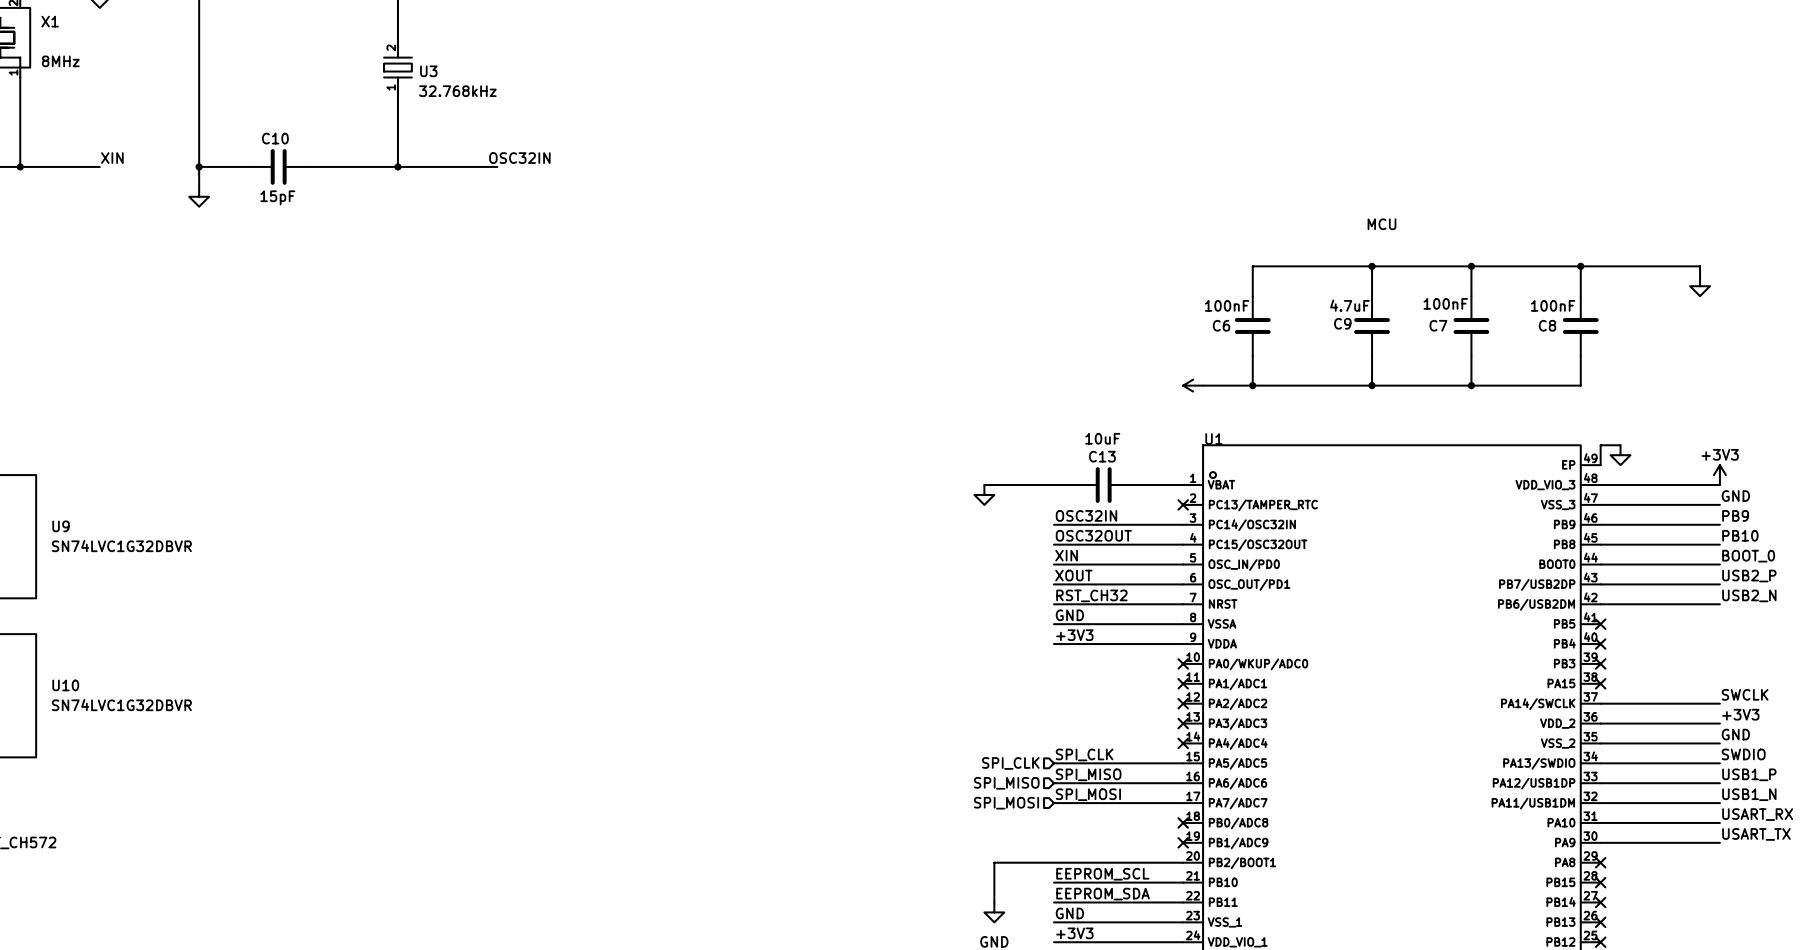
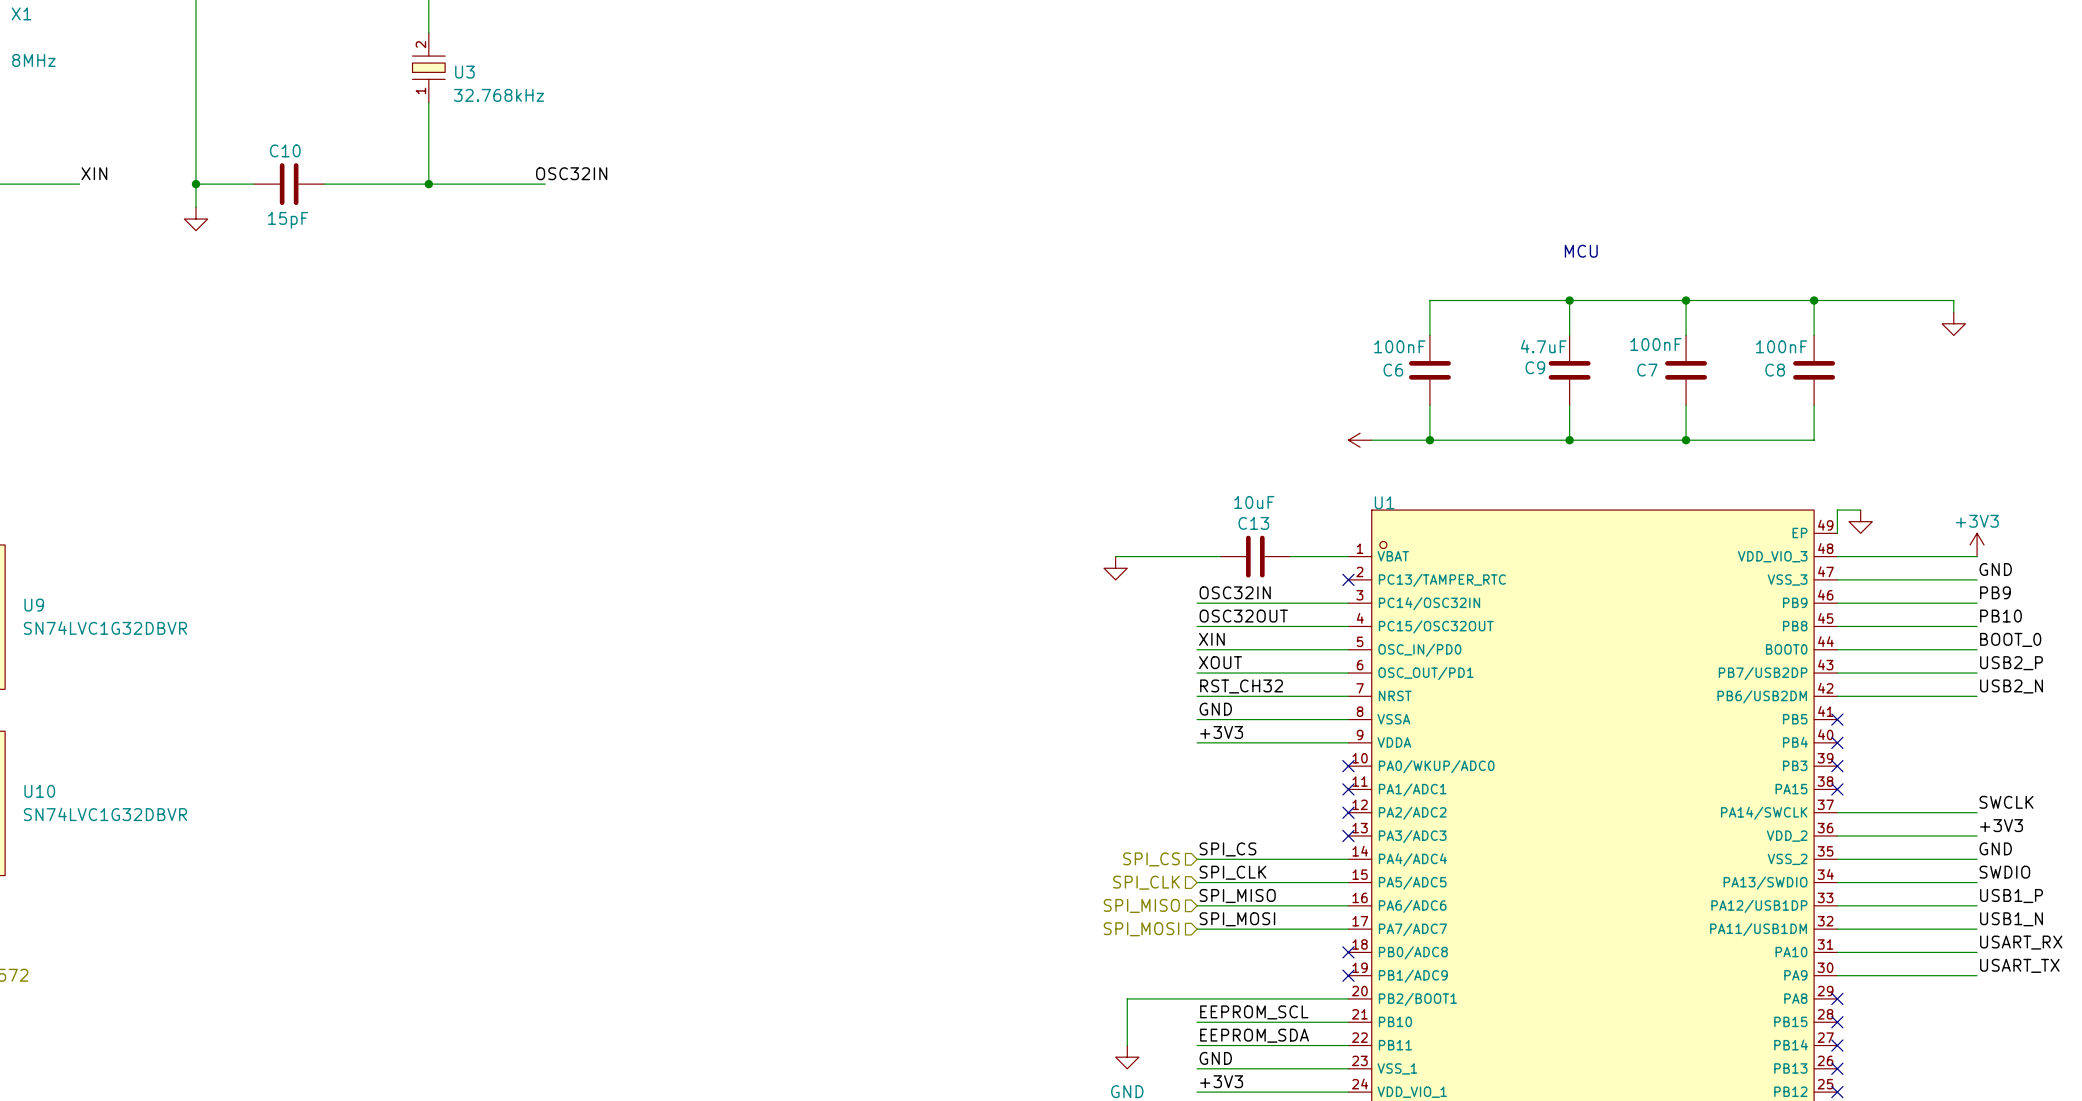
label: none -> SPI_CS (1227, 849)
hierarchical label: none -> SPI_CS (1151, 859)
wire: none -> (1197, 859) (1348, 859)
no-connect mark: (1183, 743) -> none

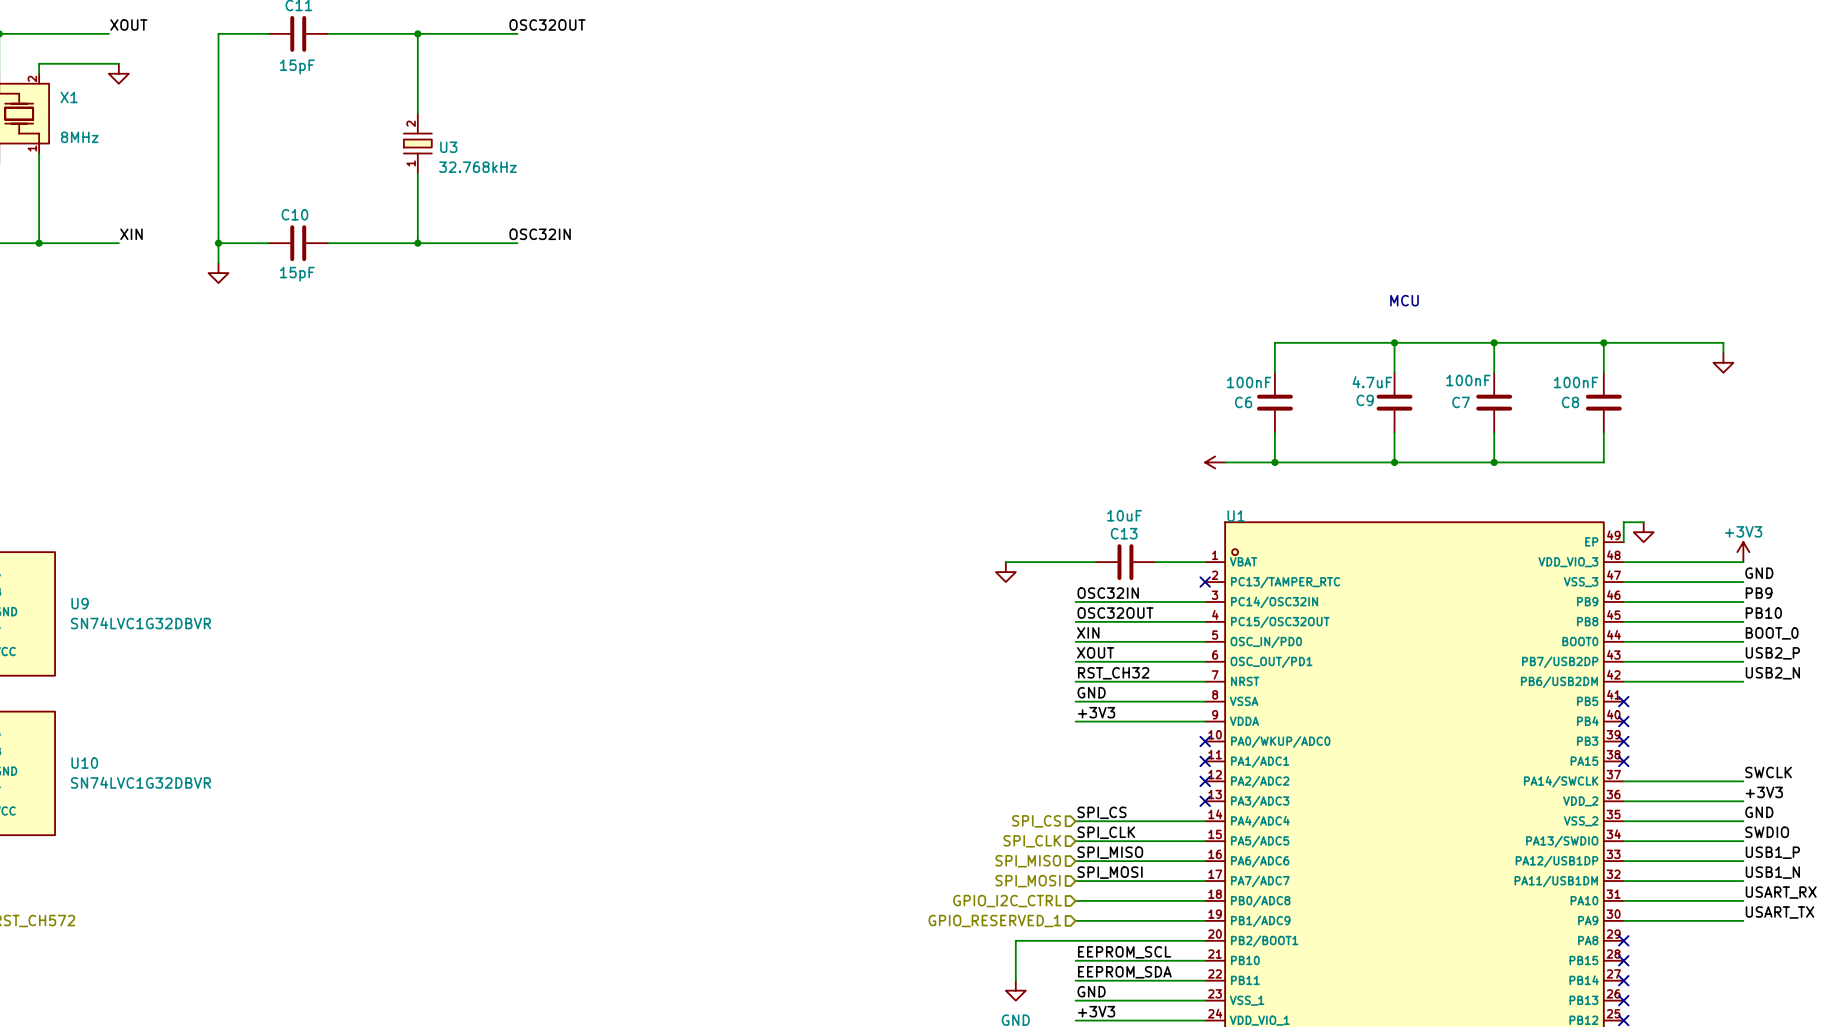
hierarchical label: none -> GPIO_I2C_CTRL (1007, 901)
wire: none -> (1075, 900) (1205, 900)
no-connect mark: (1348, 952) -> none
hierarchical label: none -> GPIO_RESERVED_1 (994, 921)
wire: none -> (1075, 920) (1205, 920)
no-connect mark: (1348, 975) -> none

